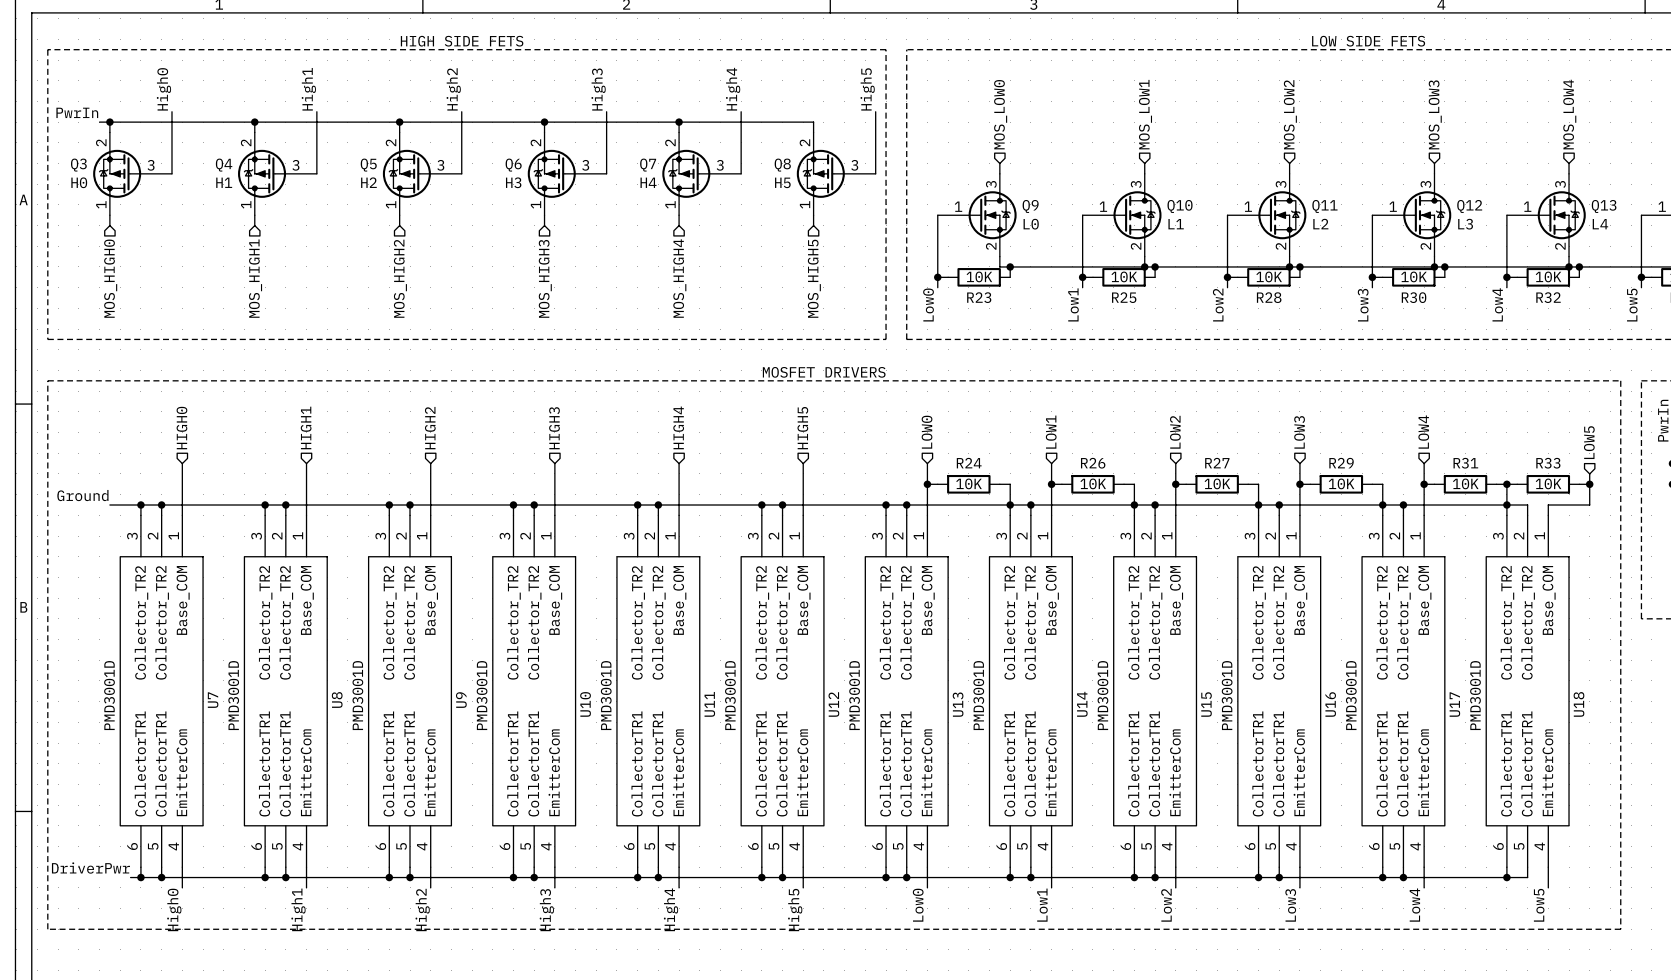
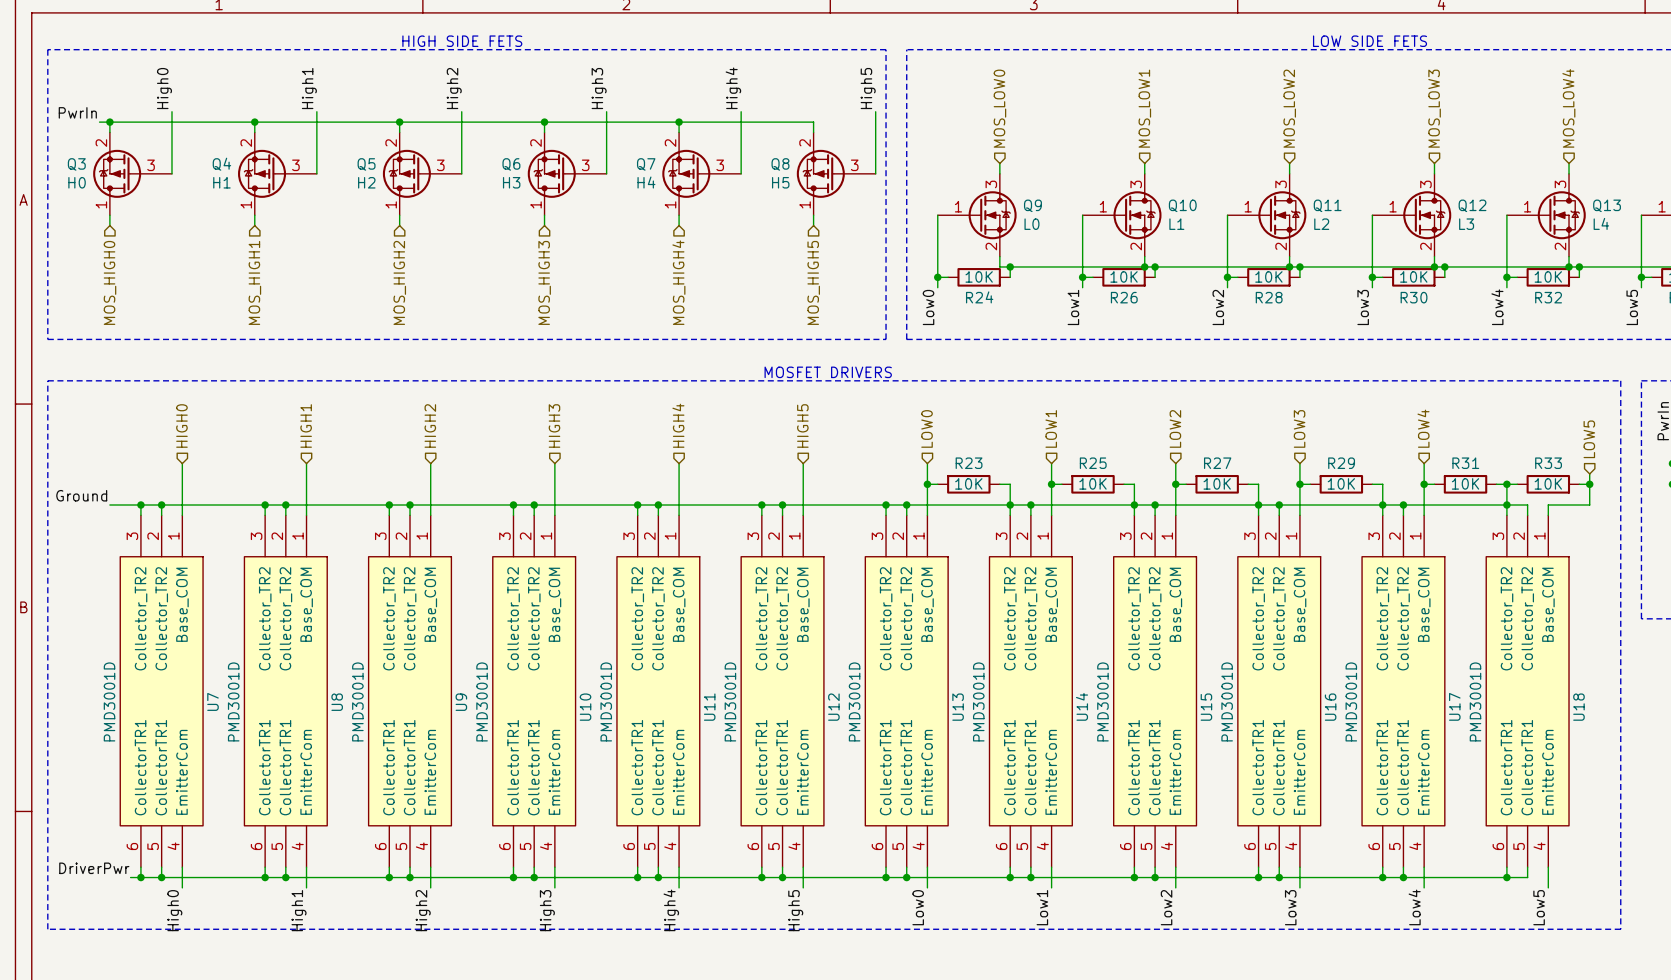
R23 name: R23 (979, 297) -> R24 (979, 297)
R25 name: R25 (1124, 297) -> R26 (1124, 297)
R24 name: R24 (969, 463) -> R23 (969, 463)
R26 name: R26 (1093, 463) -> R25 (1093, 463)

